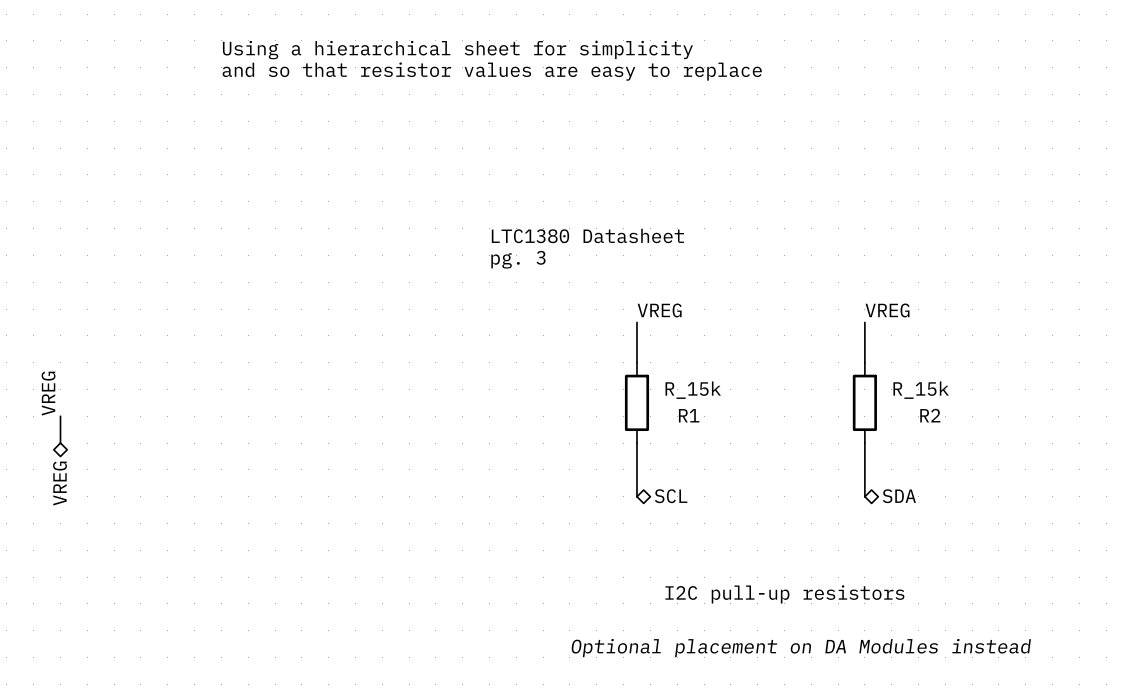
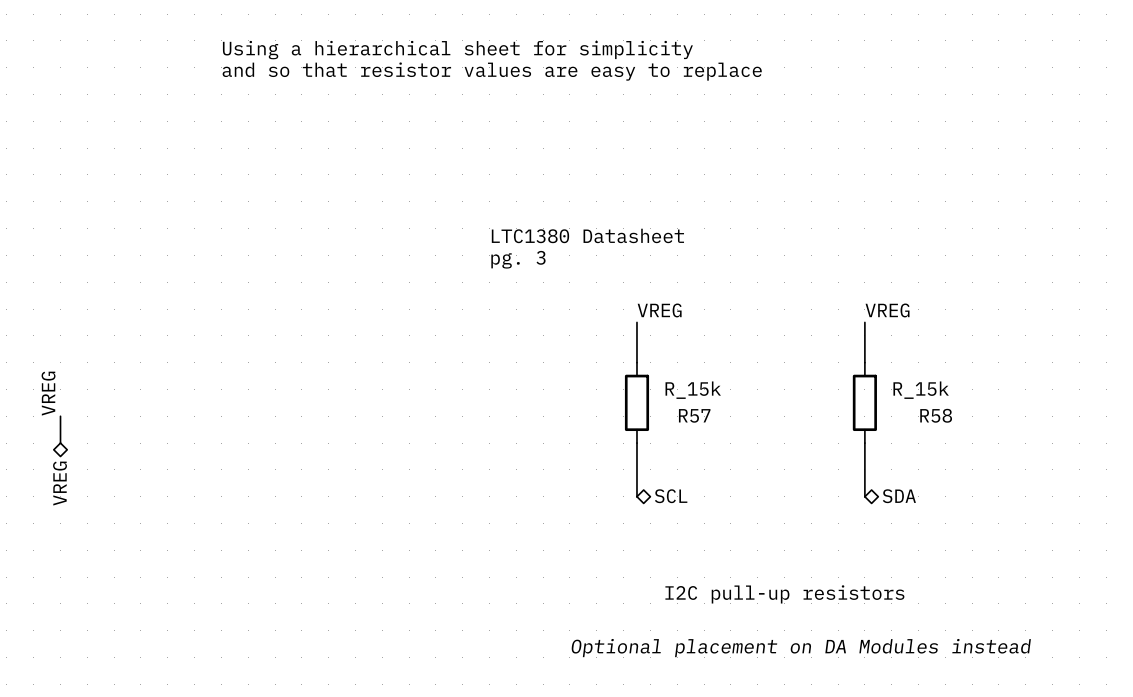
R1 name: R1 (689, 415) -> R57 (694, 415)
R2 name: R2 (930, 415) -> R58 (936, 415)

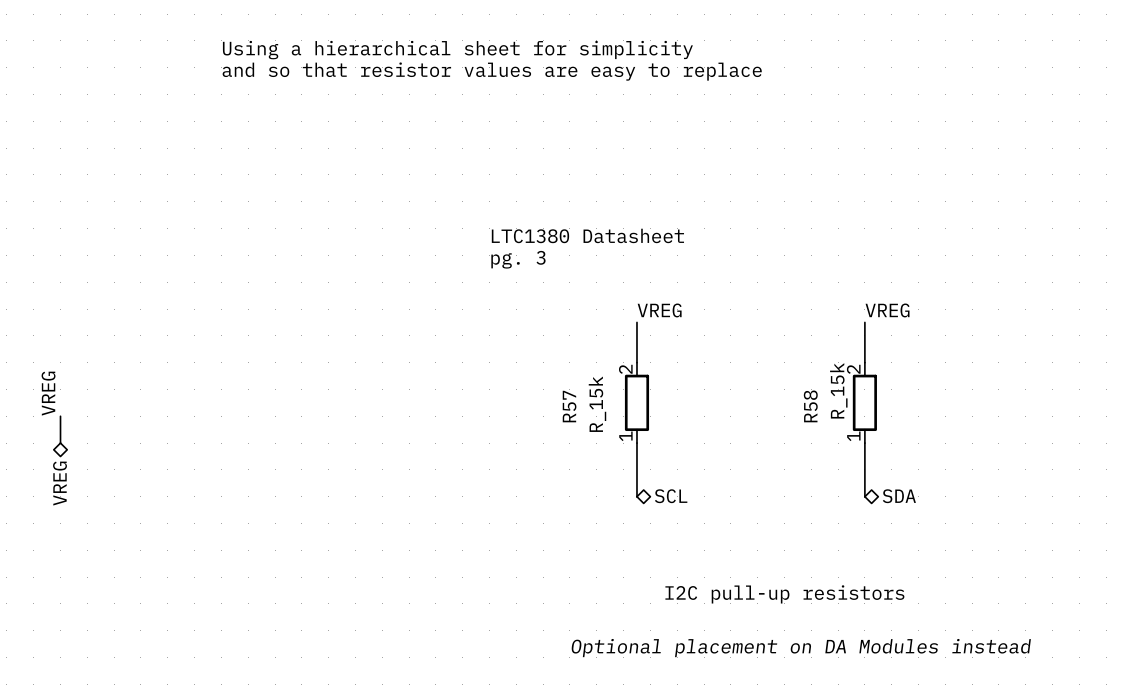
R57 pin number: none -> 2 (625, 369)
R58 pin number: none -> 2 (853, 369)
R57 value rotation: 0° (693, 390) -> 90° counterclockwise (597, 404)
R57 value position: R_15k (693, 390) -> R_15k (597, 404)
R58 value rotation: 0° (921, 390) -> 90° counterclockwise (838, 390)
R58 value position: R_15k (921, 390) -> R_15k (838, 390)
R57 name rotation: 0° (694, 415) -> 90° counterclockwise (569, 406)
R57 name position: R57 (694, 415) -> R57 (569, 406)
R58 name rotation: 0° (936, 415) -> 90° counterclockwise (810, 406)
R58 name position: R58 (936, 415) -> R58 (810, 406)
R57 pin number: none -> 1 (625, 436)
R58 pin number: none -> 1 (853, 436)

